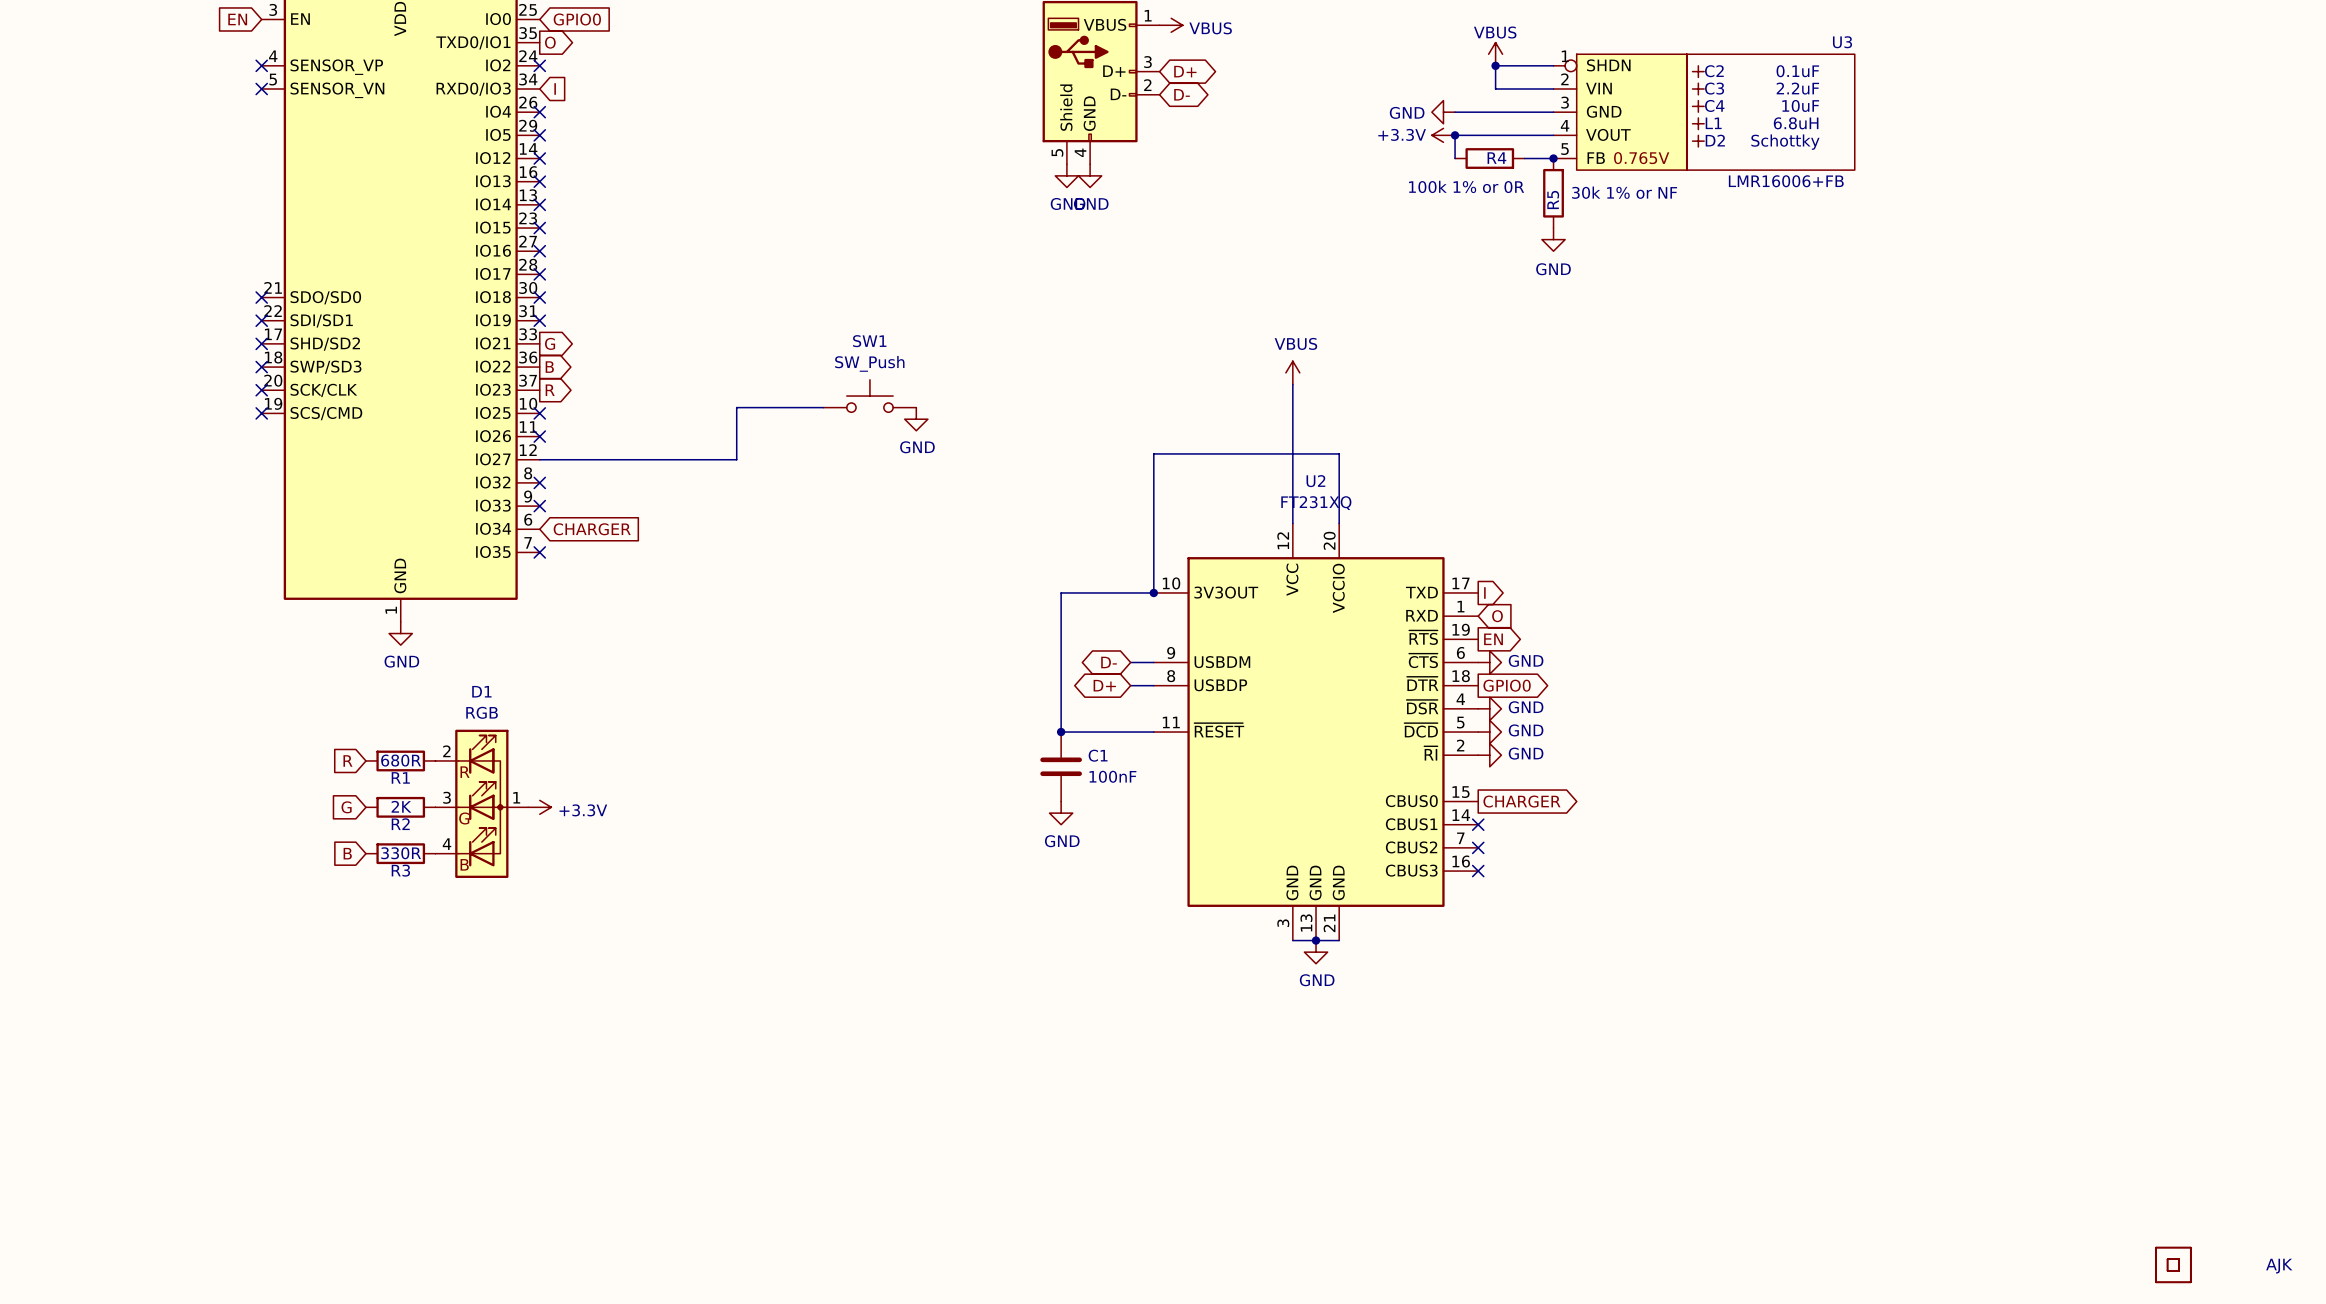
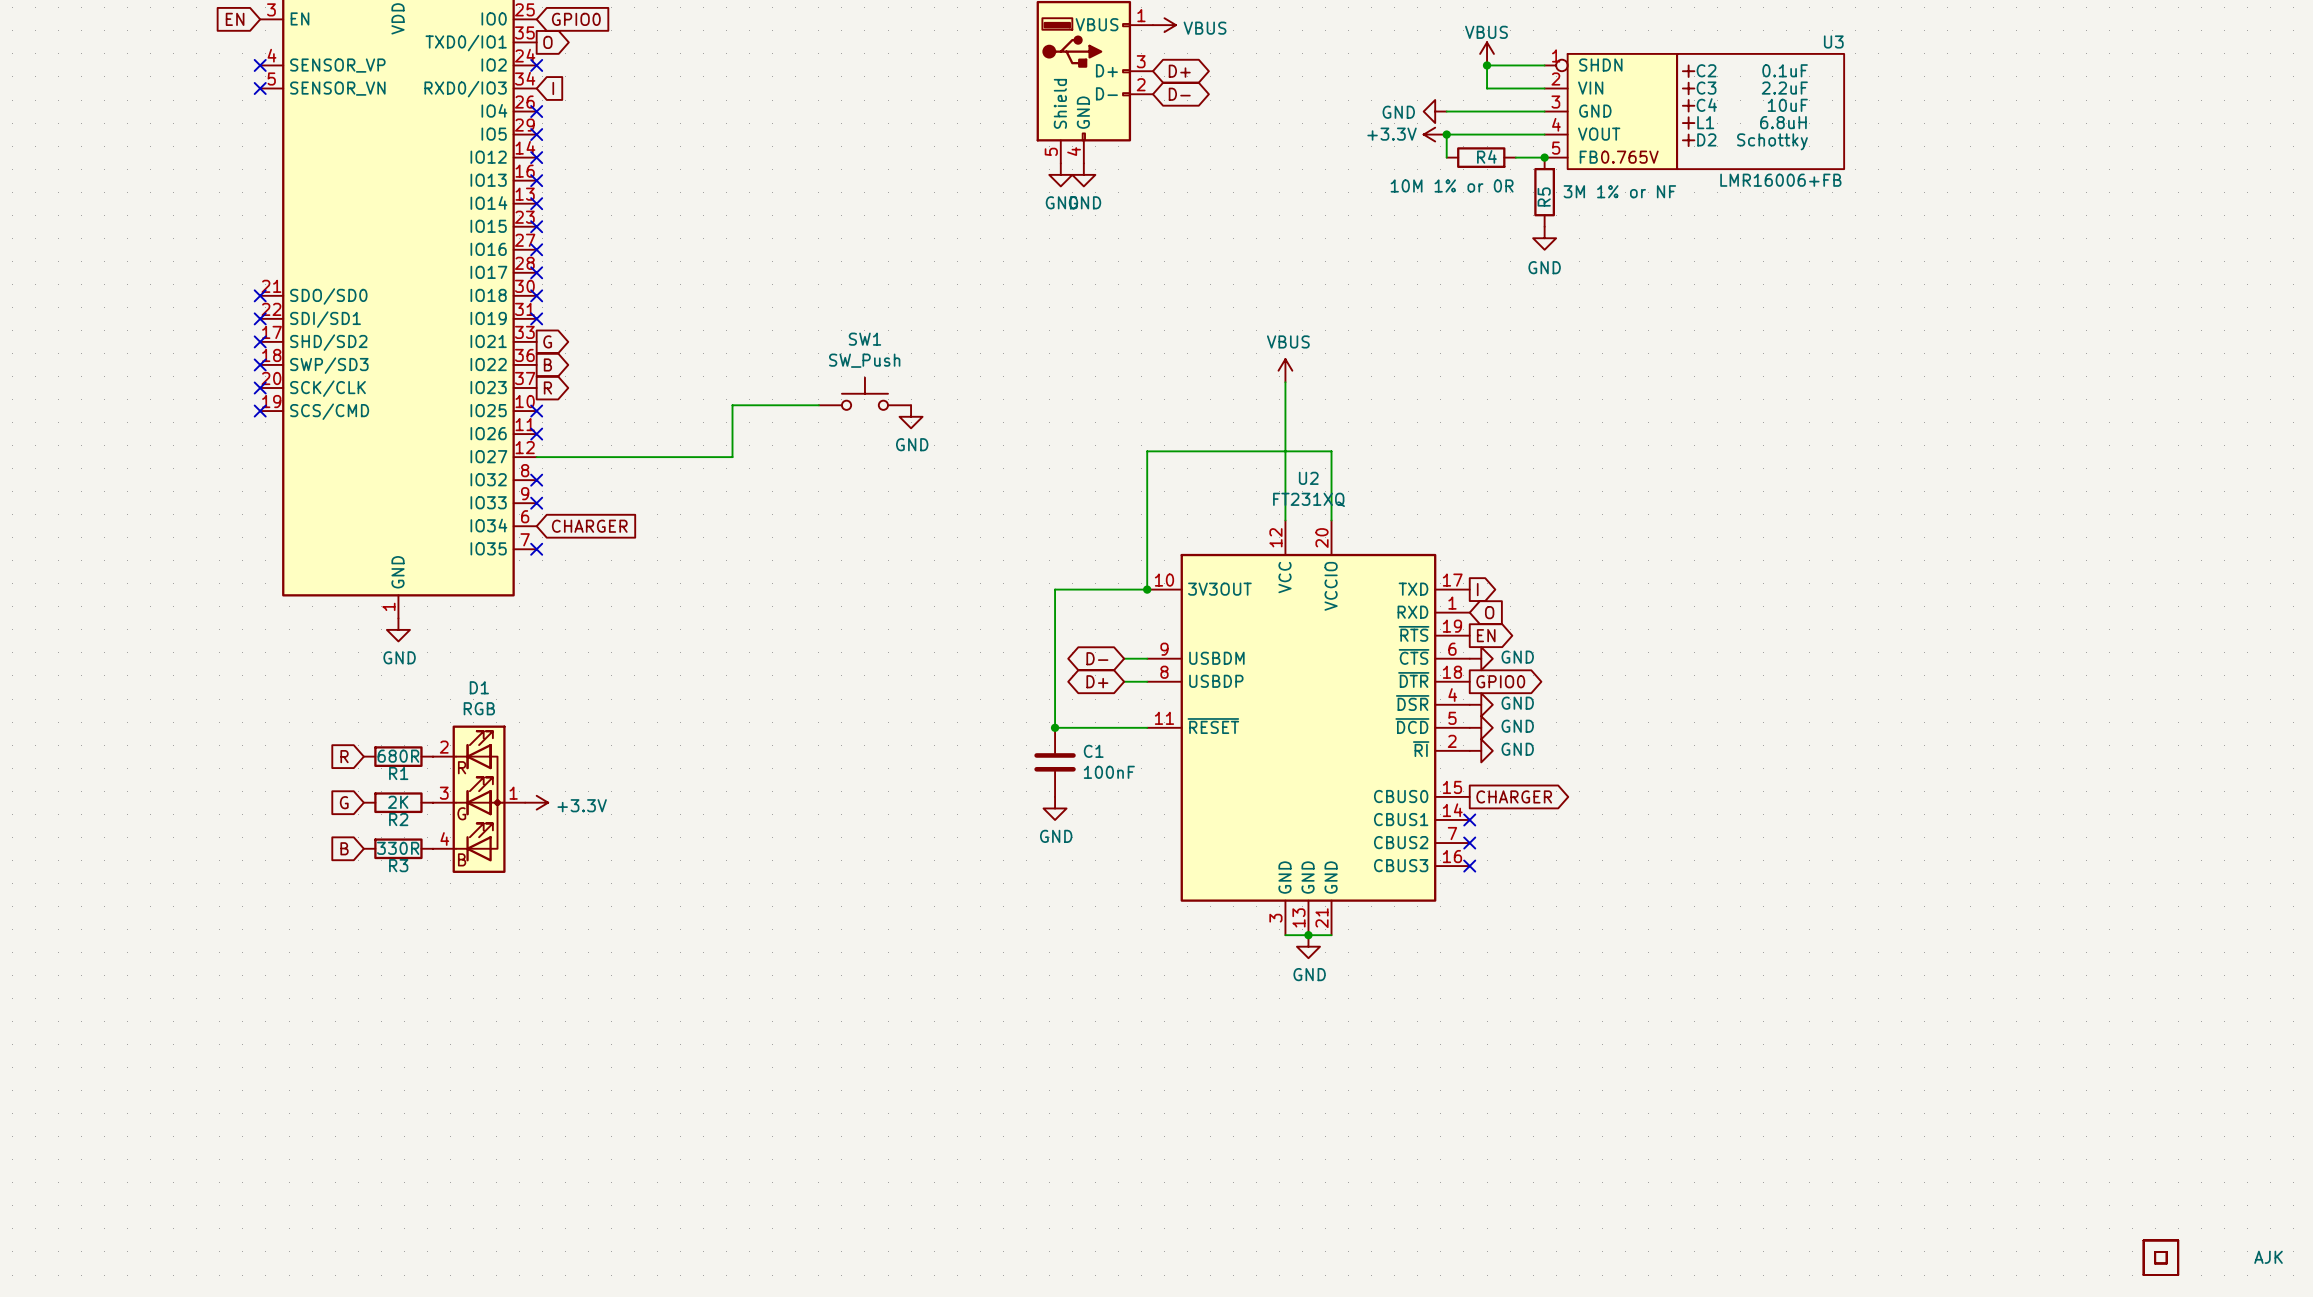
R4 value: 100k 1% or 0R (1466, 186) -> 10M 1% or 0R (1452, 185)
R5 value: 30k 1% or NF (1624, 192) -> 3M 1% or NF (1619, 191)

